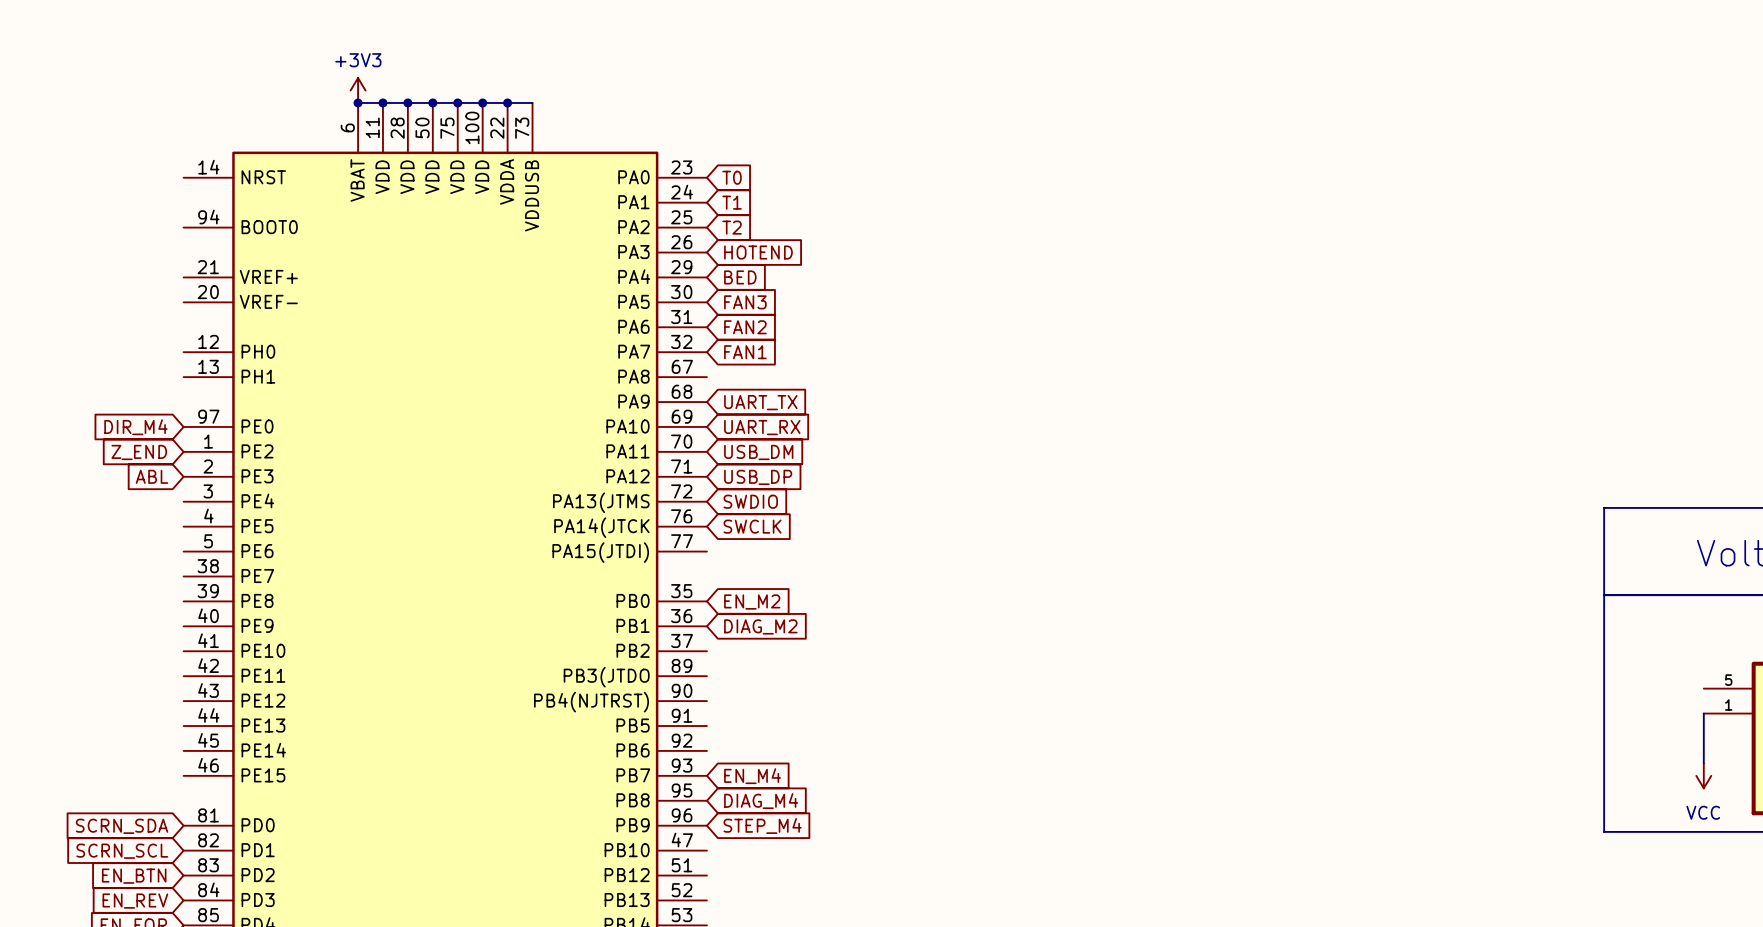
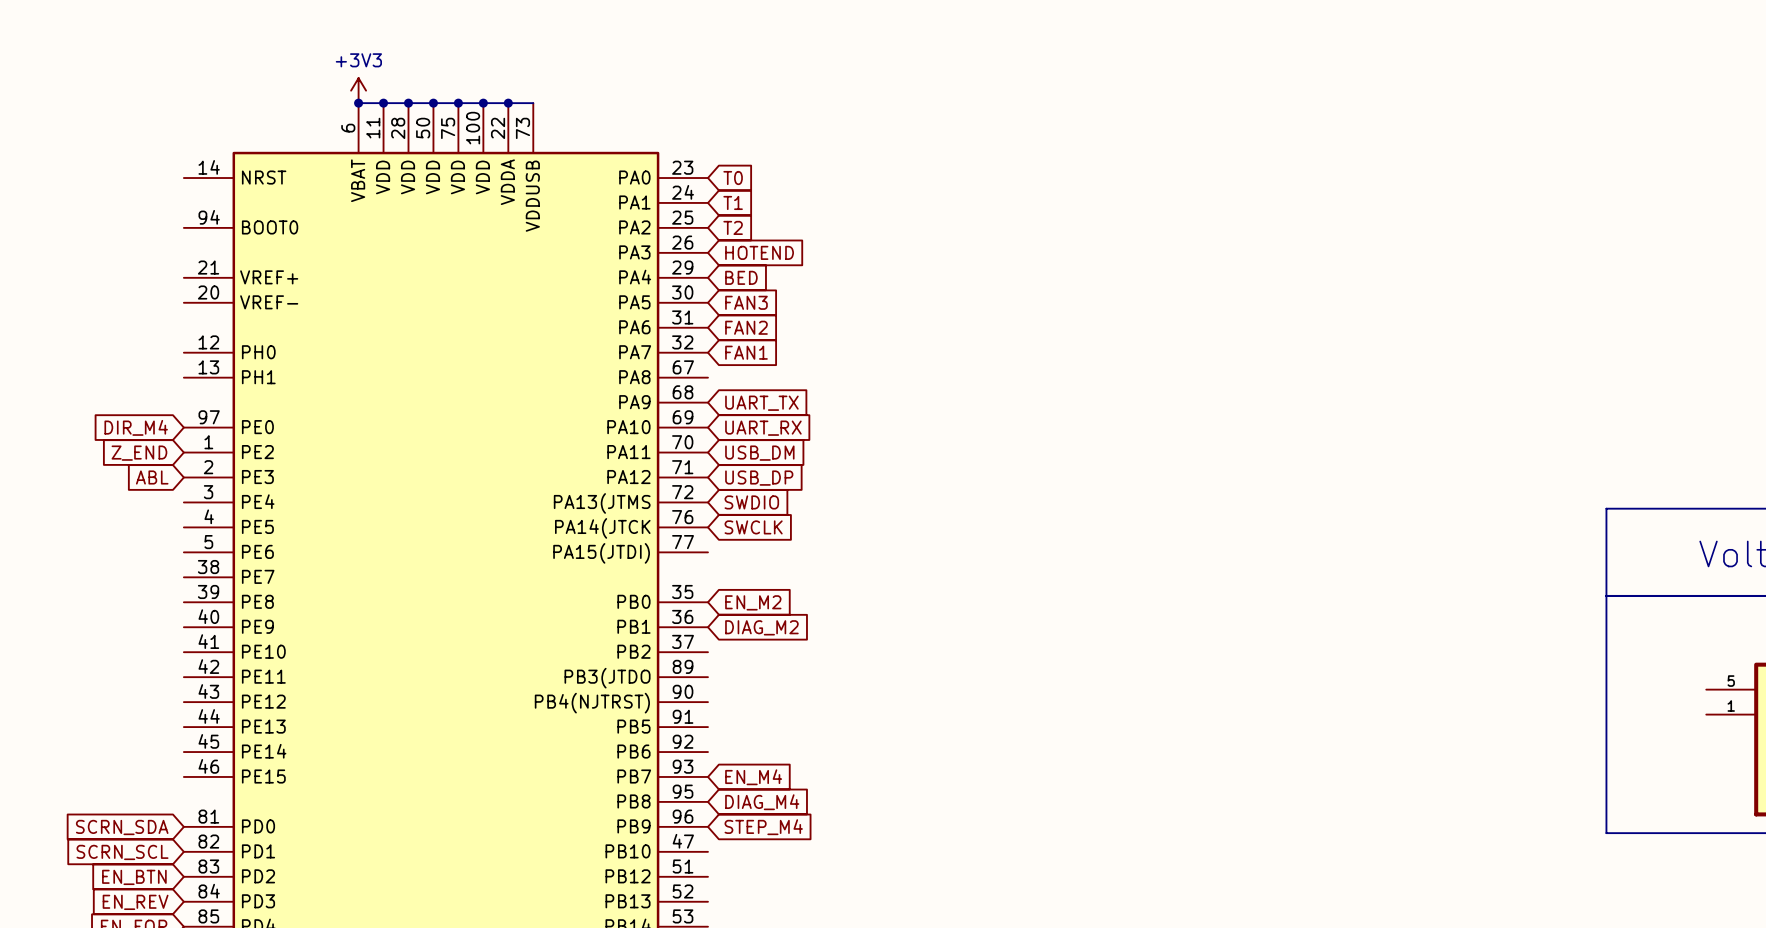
wire: (1703, 713) (1703, 763) -> none
power symbol: VCC (1703, 775) -> none

